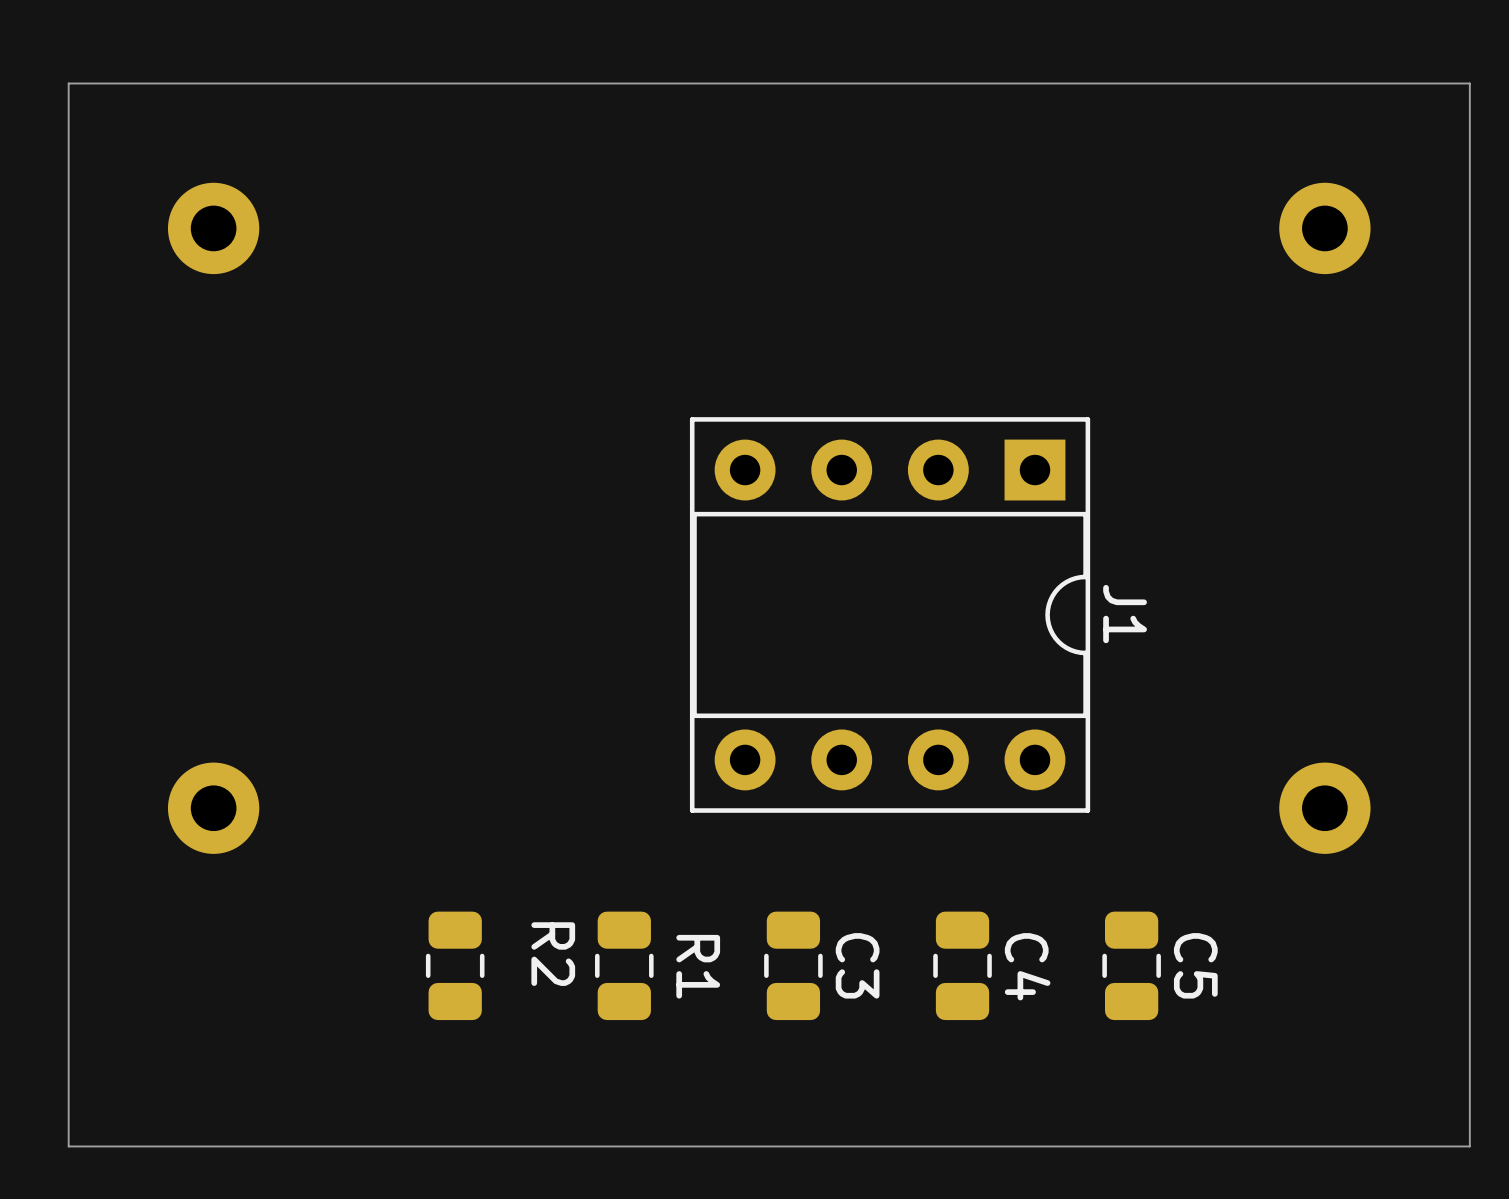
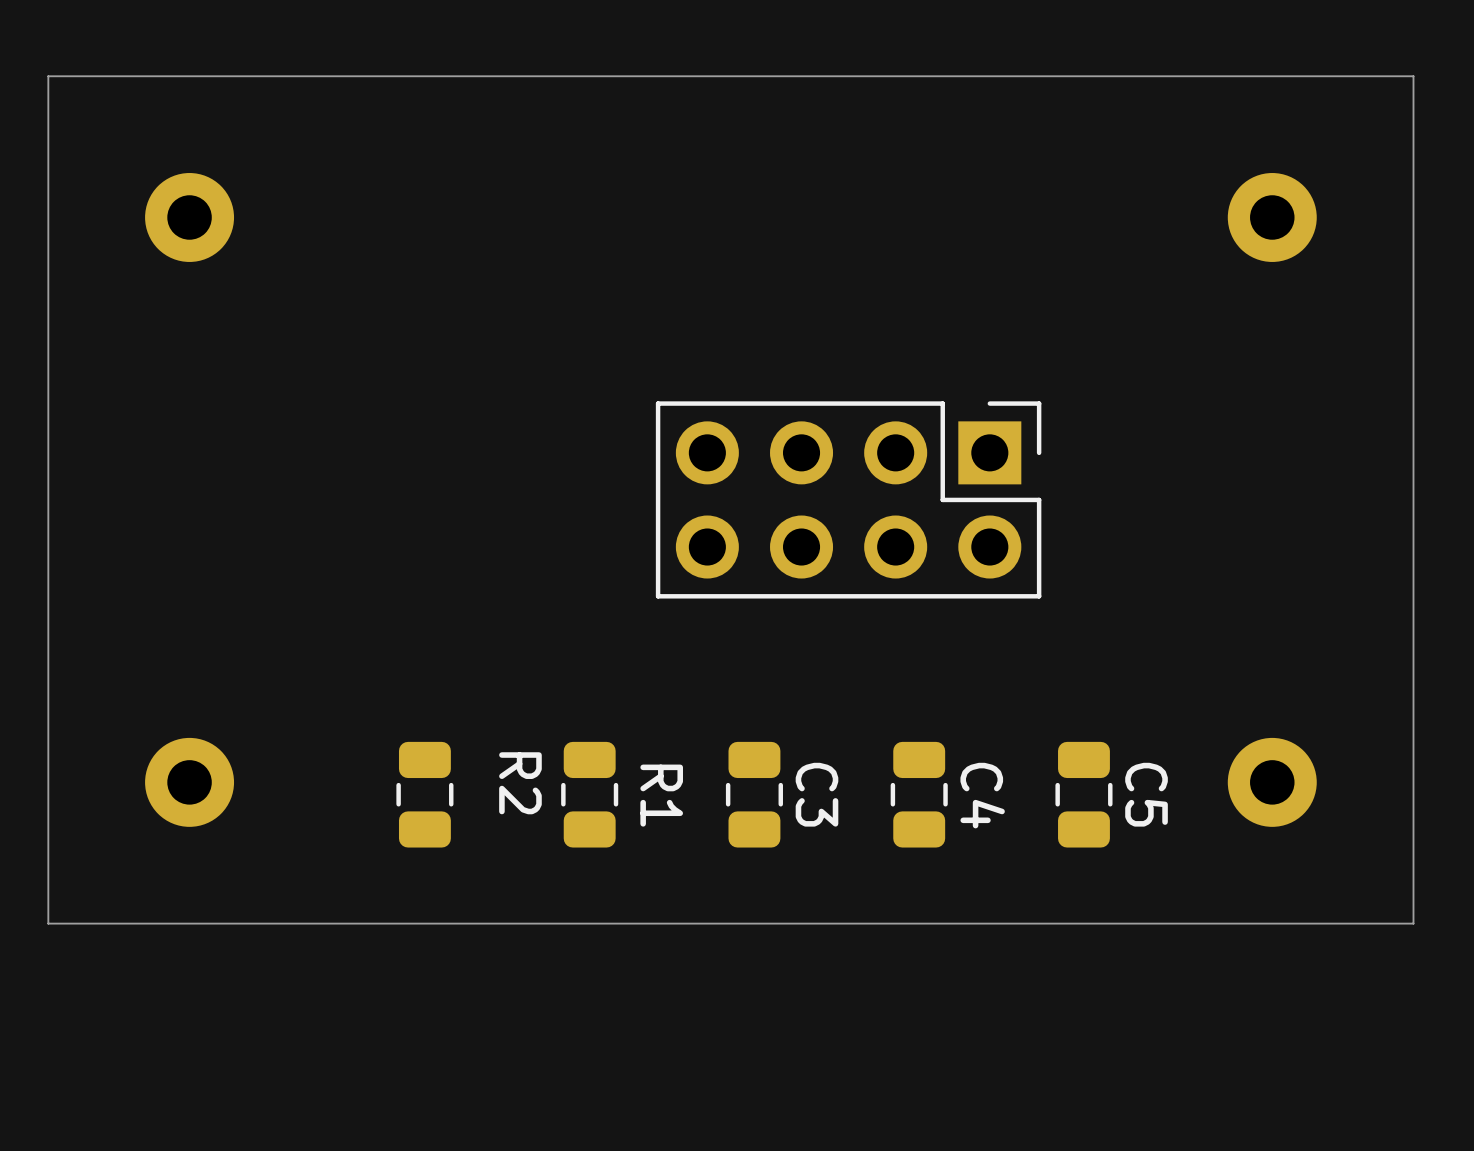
part: none -> (848, 499)
J1: (890, 614) -> none
board edge: (1469, 953) (1469, 1146) (68, 1146) (68, 953) -> (1413, 923) (48, 923)
R2 position: (455, 965) -> (424, 794)
R1 position: (624, 965) -> (589, 794)
C3 position: (793, 965) -> (754, 794)
C4 position: (962, 965) -> (919, 794)
C5 position: (1131, 965) -> (1083, 794)

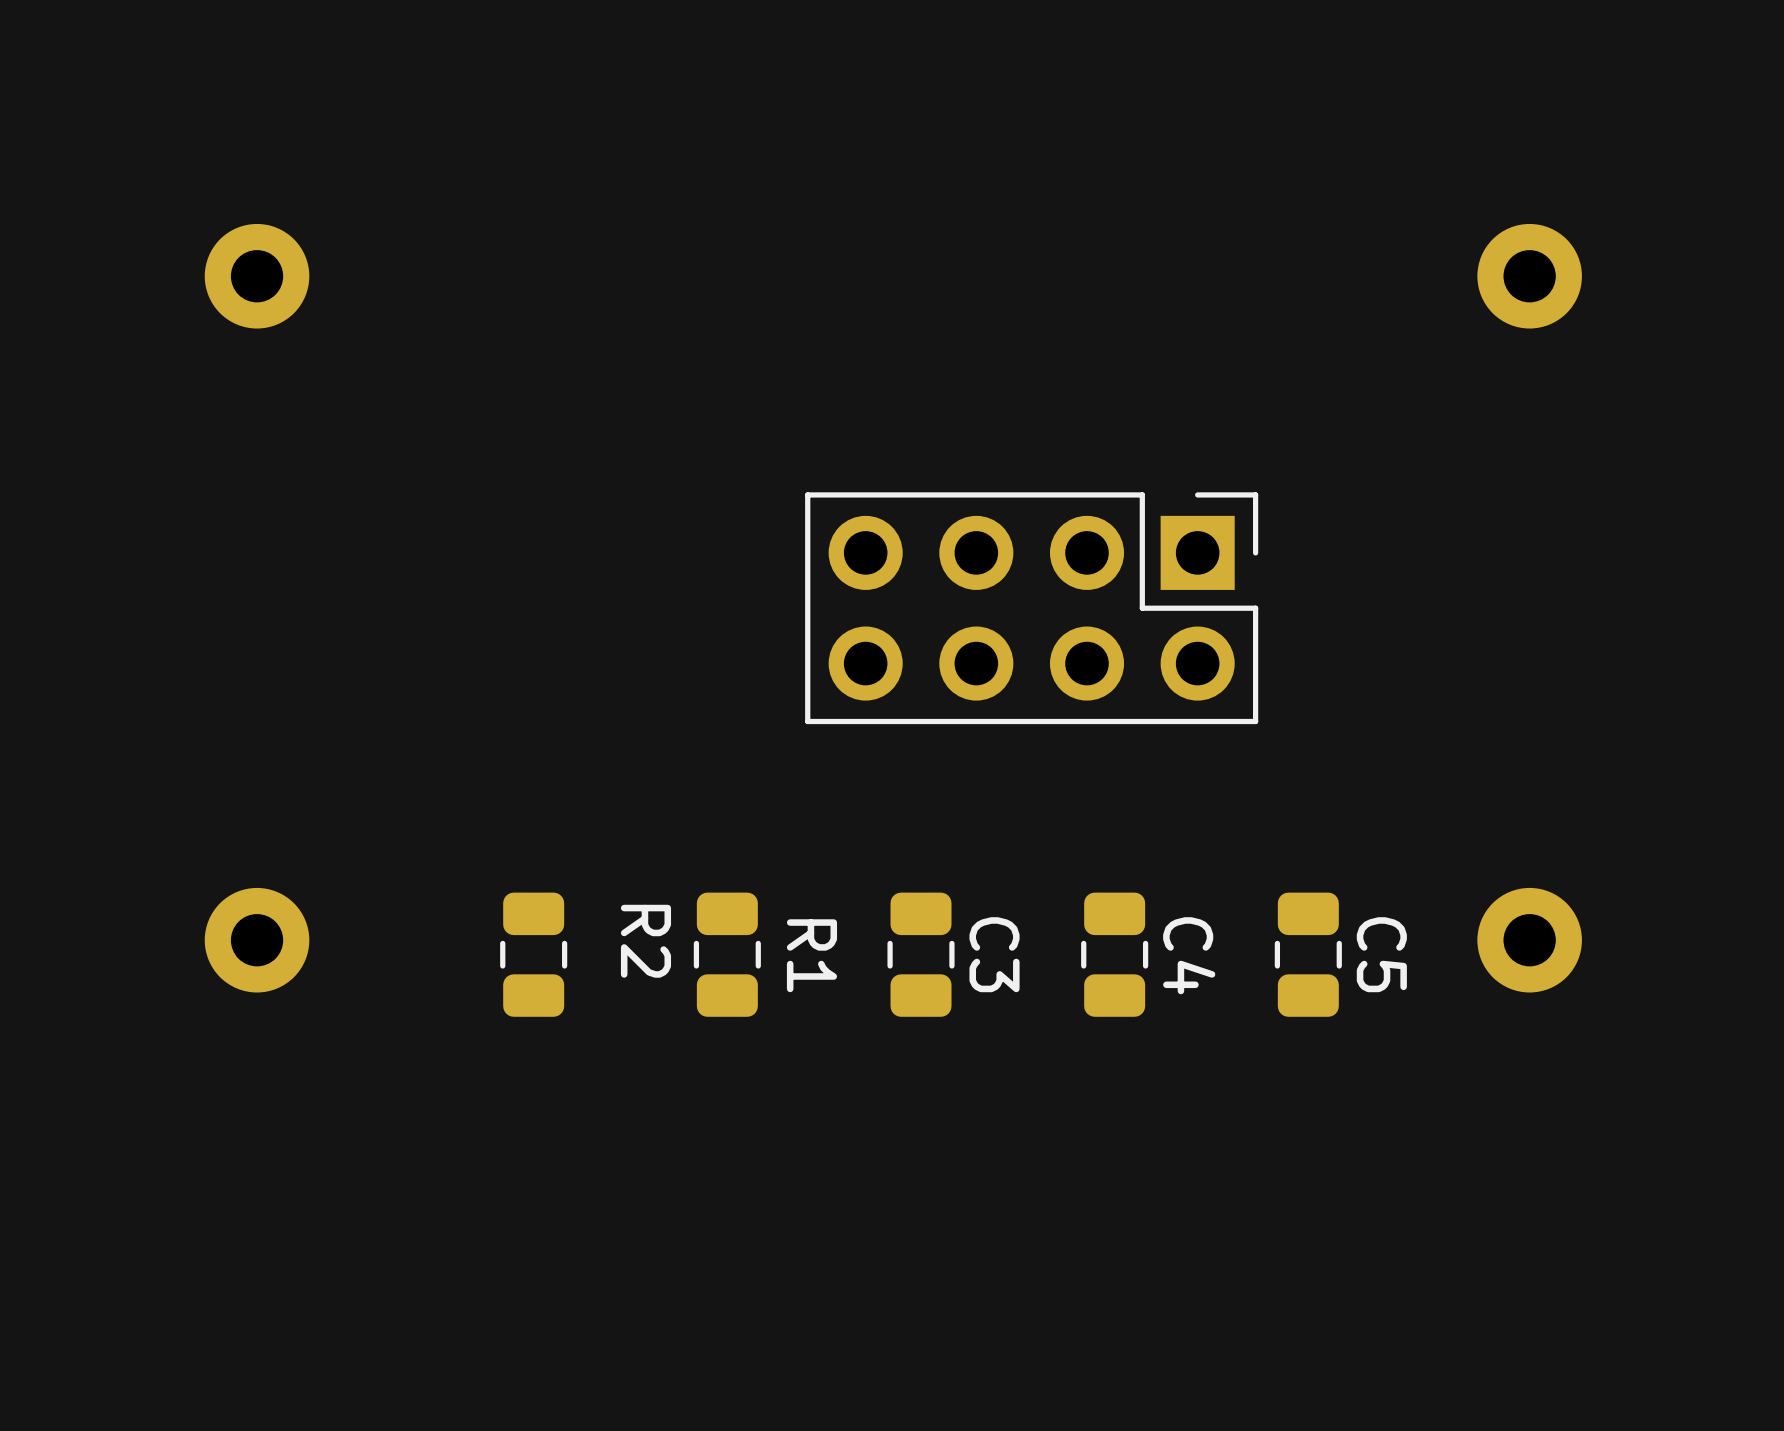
board edge: (1413, 76) (1413, 923) (48, 923) (48, 76) (1413, 76) -> none

